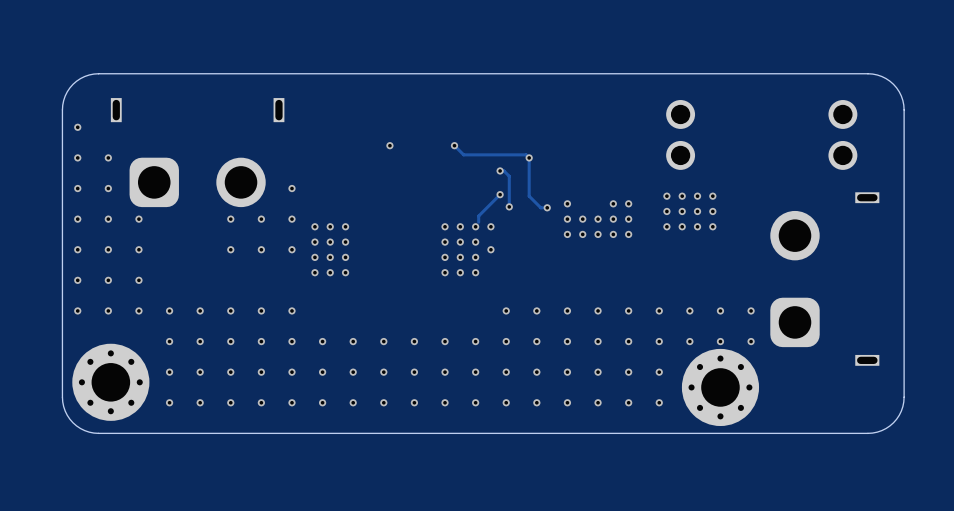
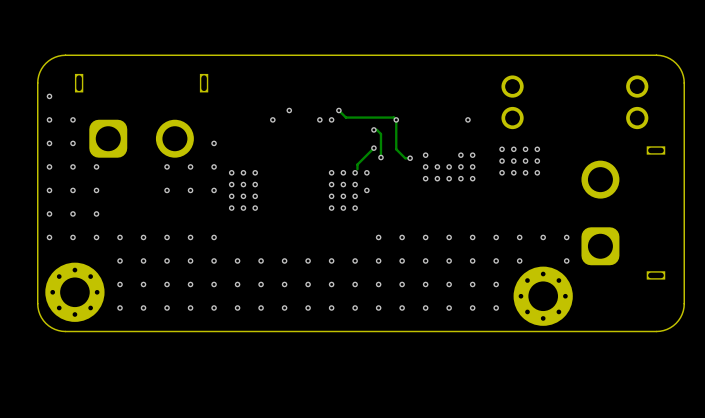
via: none -> (272, 119)
via: none -> (319, 119)
via: none -> (331, 119)
via: none -> (467, 119)
via: (720, 341) -> none

